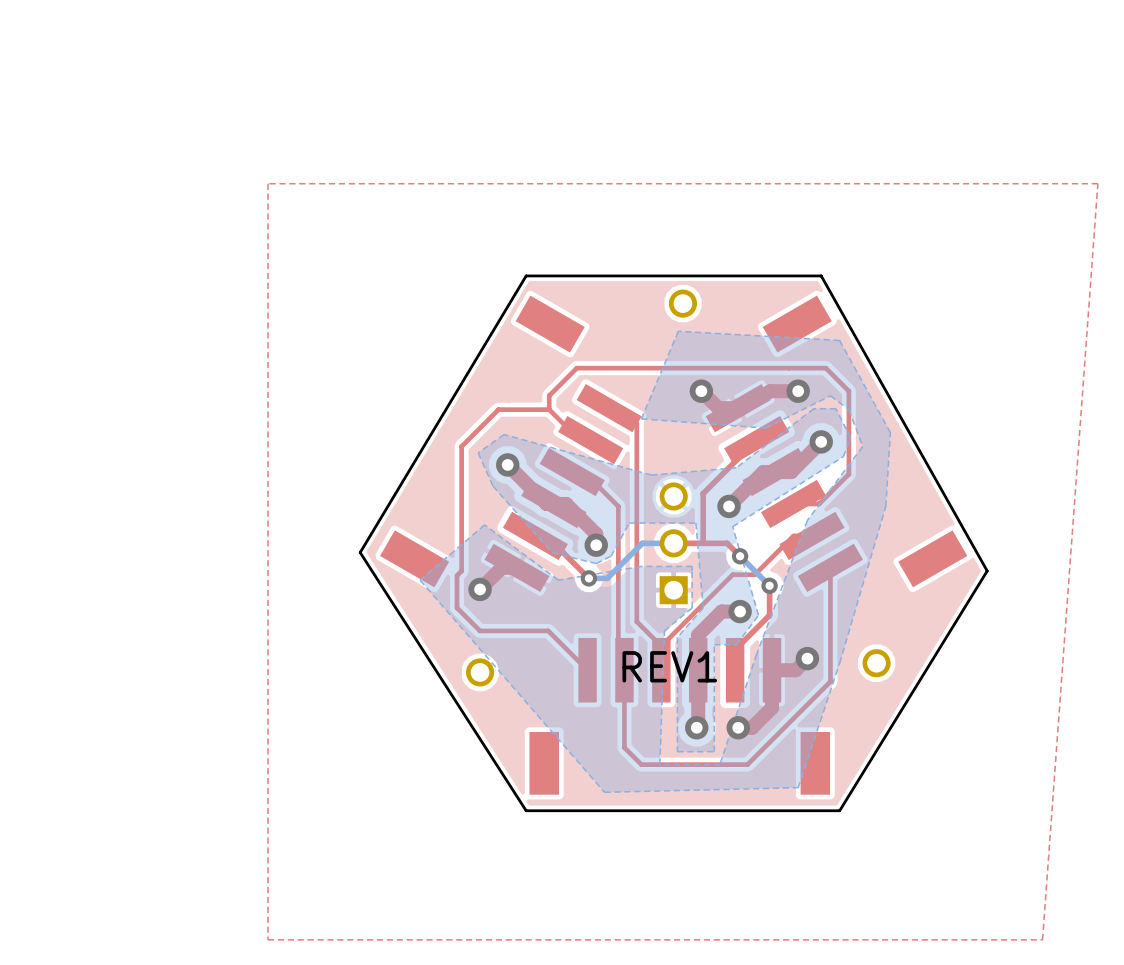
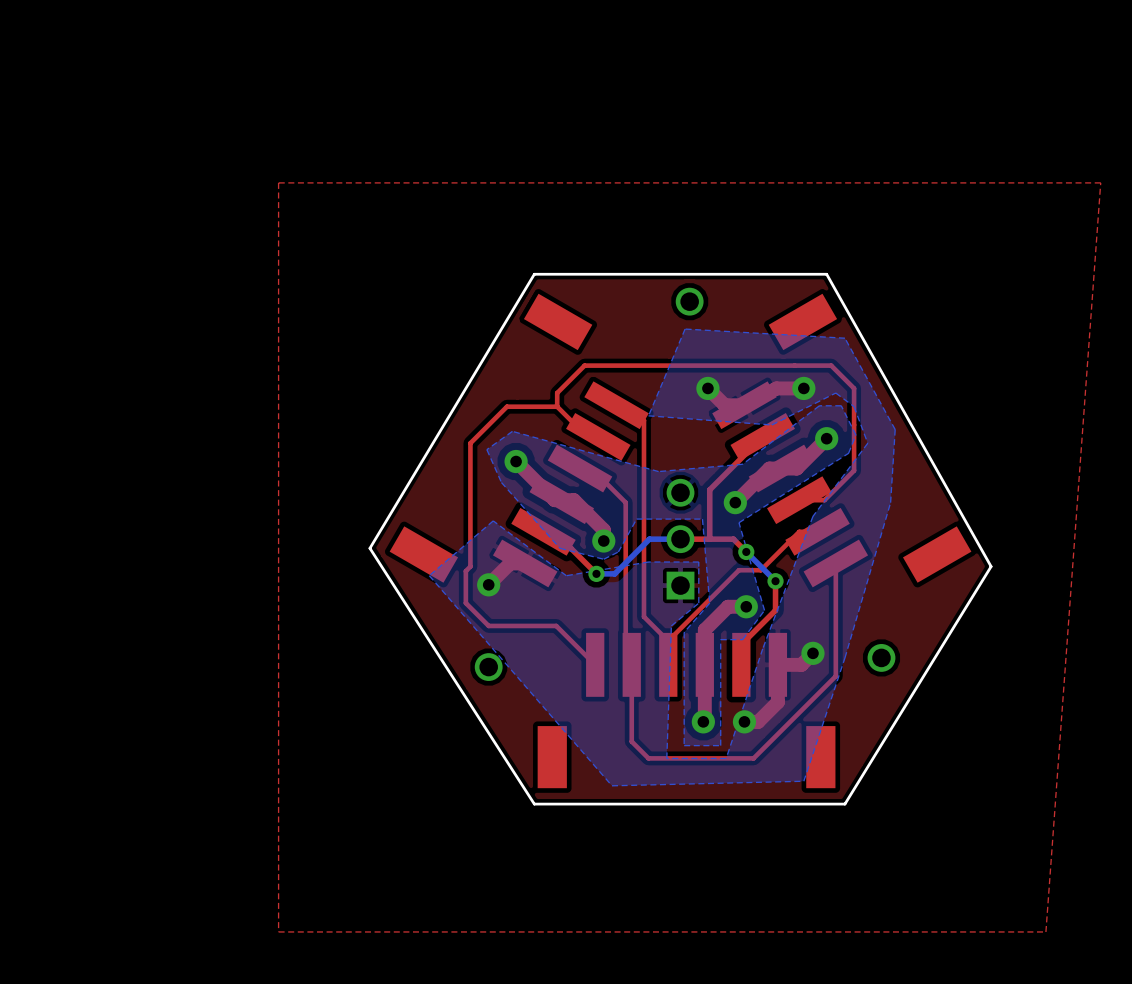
text: REV1 (669, 666) -> none

